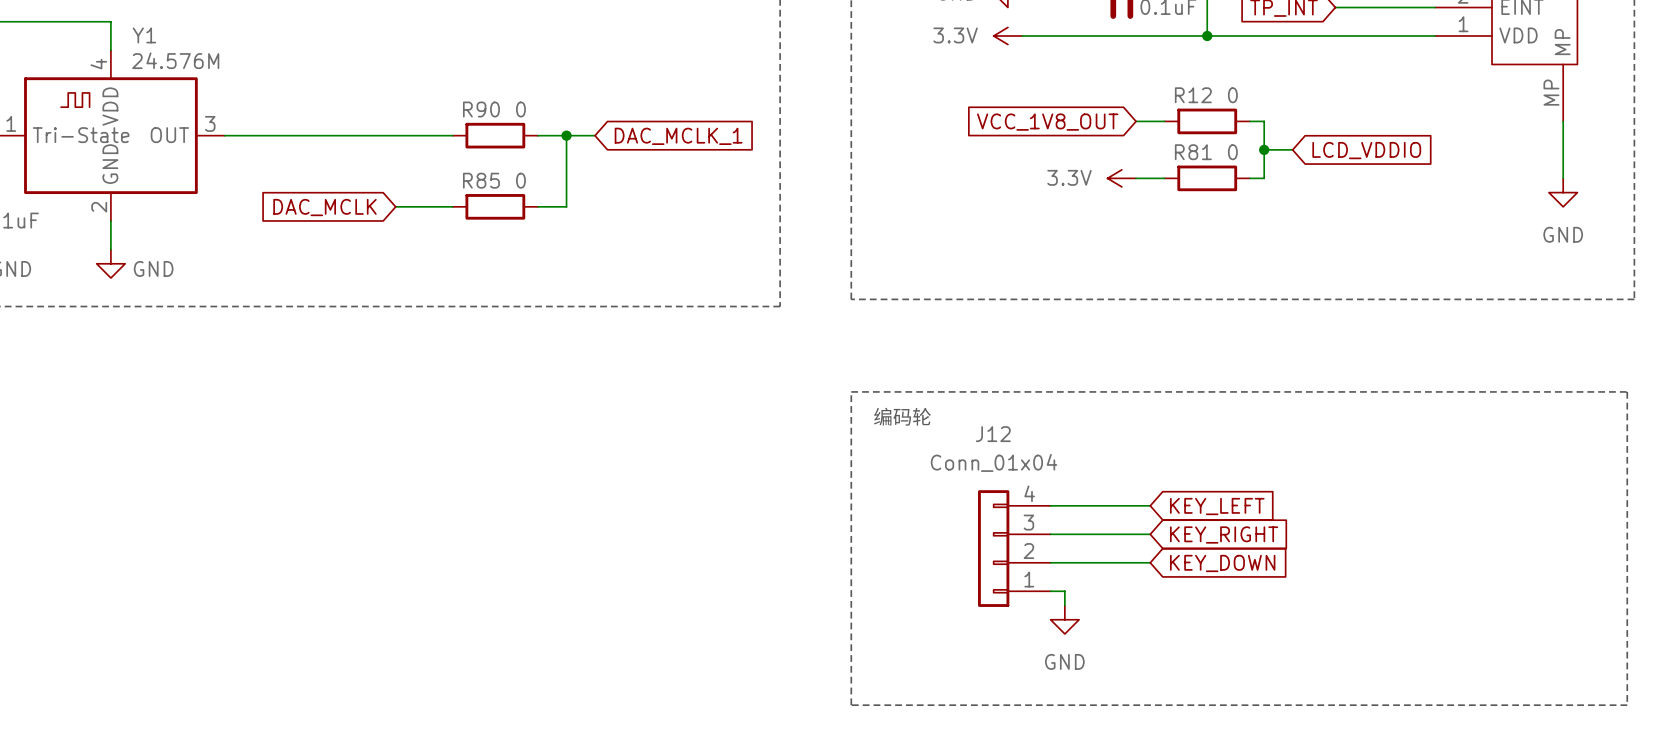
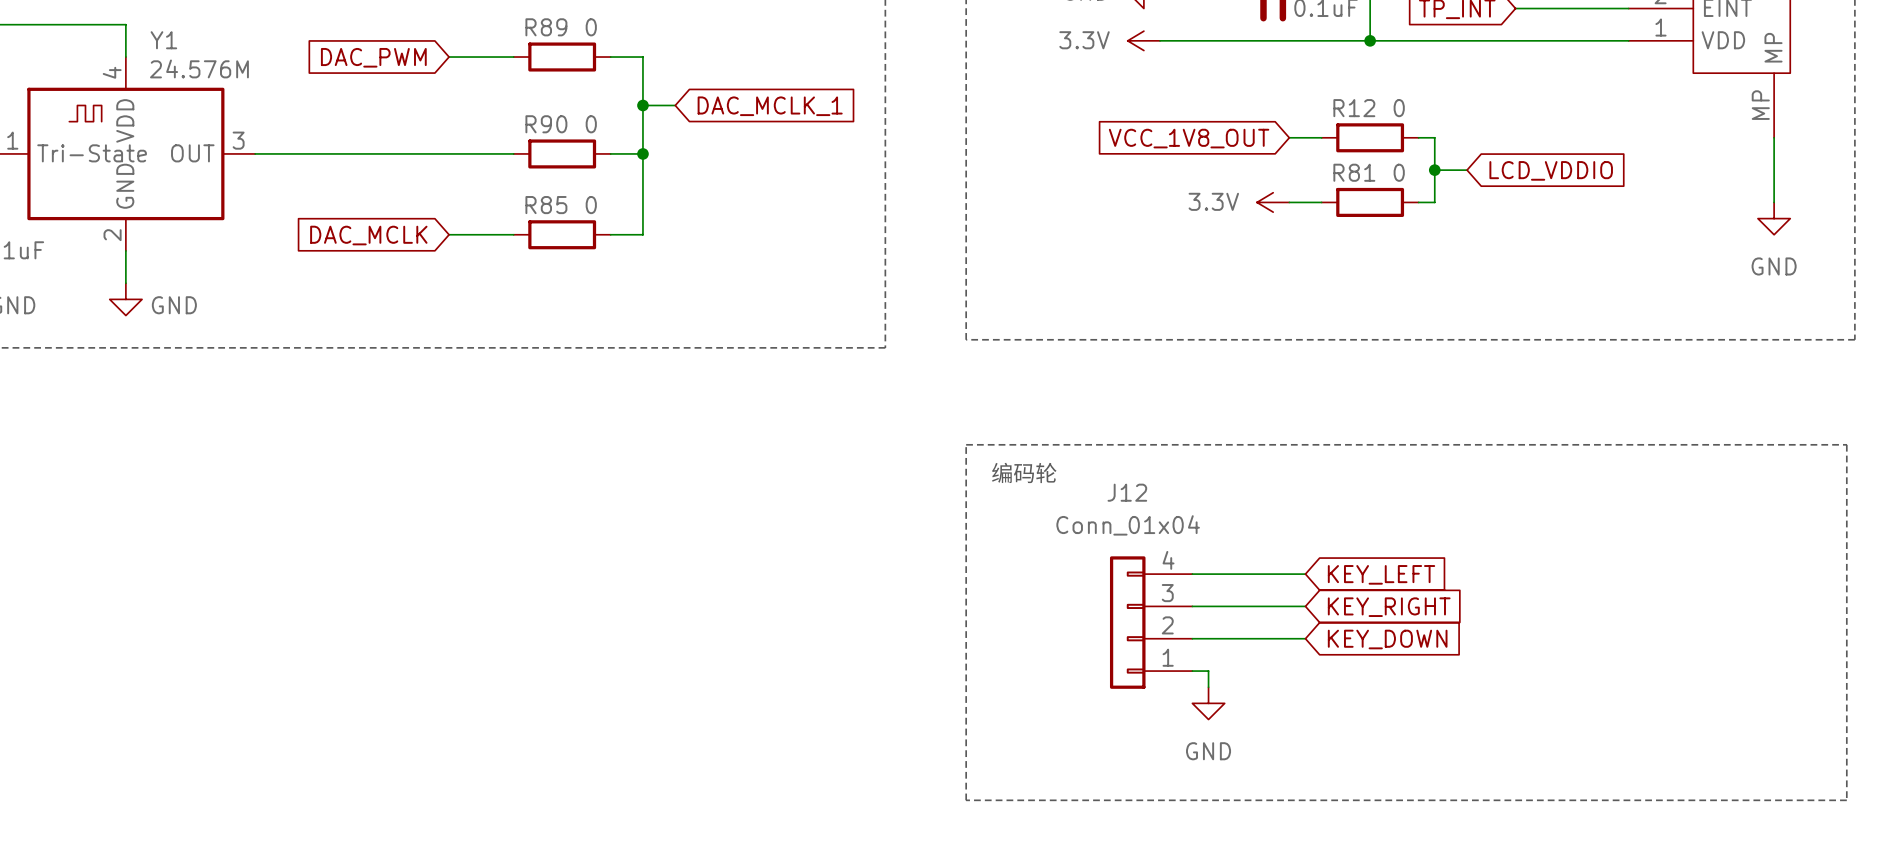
global label: none -> DAC_PWM (373, 57)
wire: none -> (449, 57) (513, 57)
R89: none -> 0 (562, 57)
wire: none -> (642, 105) (675, 105)
junction: none -> (642, 105)
wire: (566, 135) (595, 135) -> (642, 153) (642, 57) (610, 57)
global label position: DAC_MCLK_1 (678, 136) -> DAC_MCLK_1 (770, 106)

